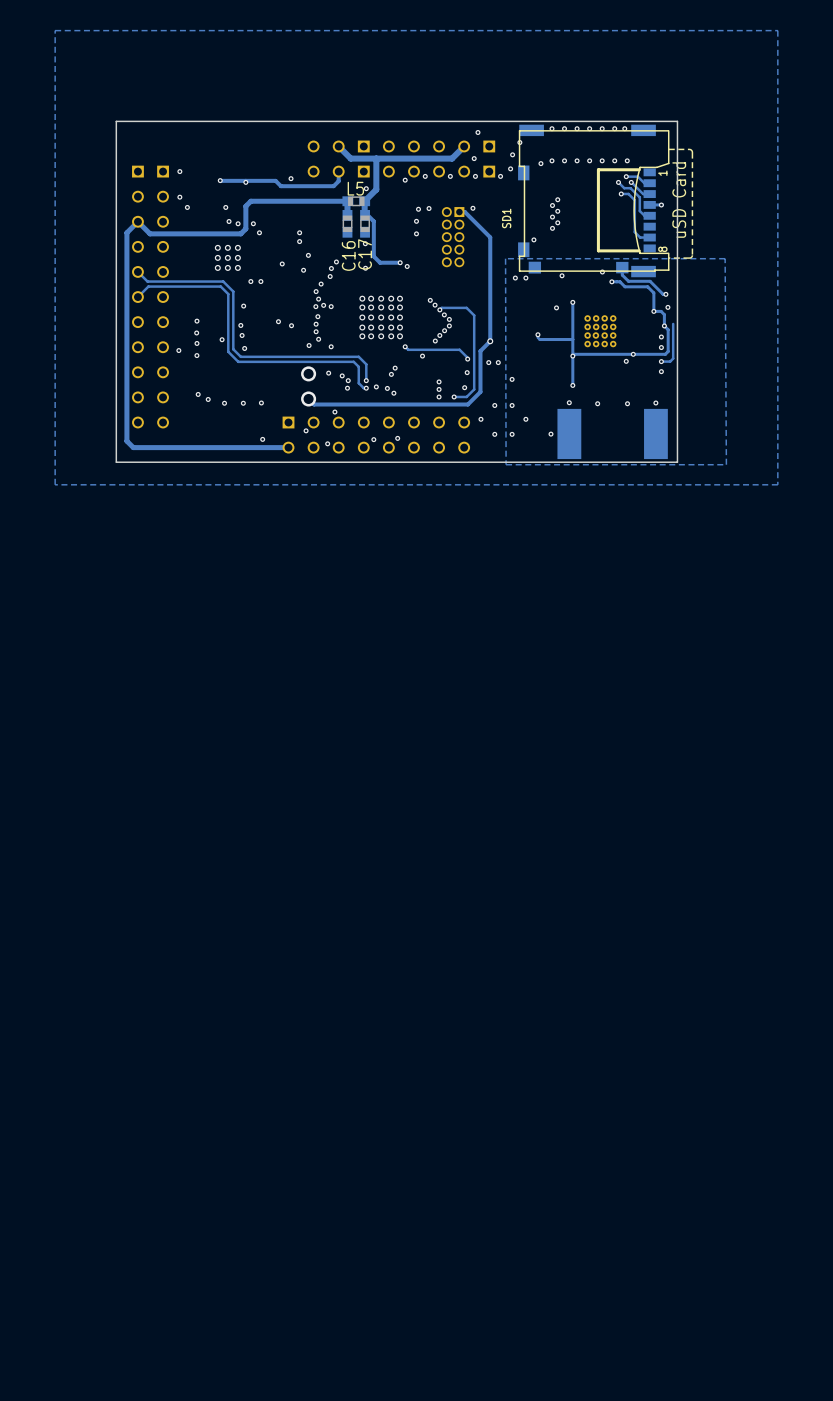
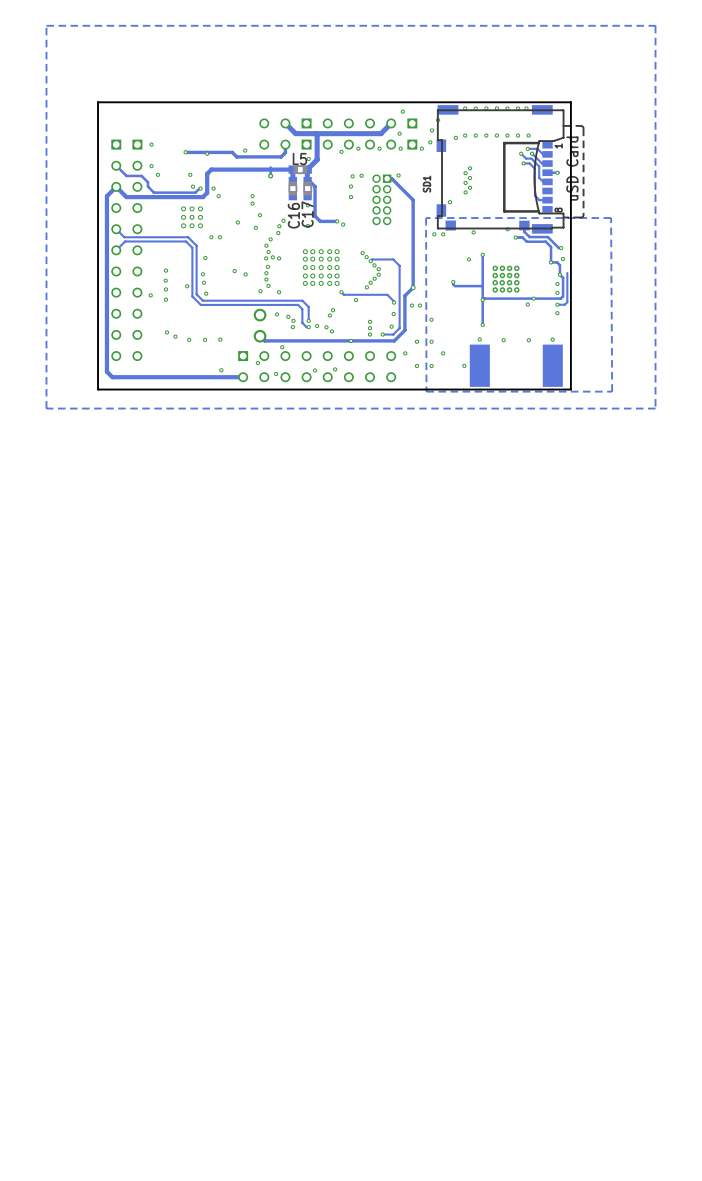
track: none -> (116, 165) (126, 175) (141, 175) (153, 192) (195, 192) (199, 188)
track: none -> (270, 167) (270, 175)
via: none -> (270, 175)
via: none -> (350, 340)

